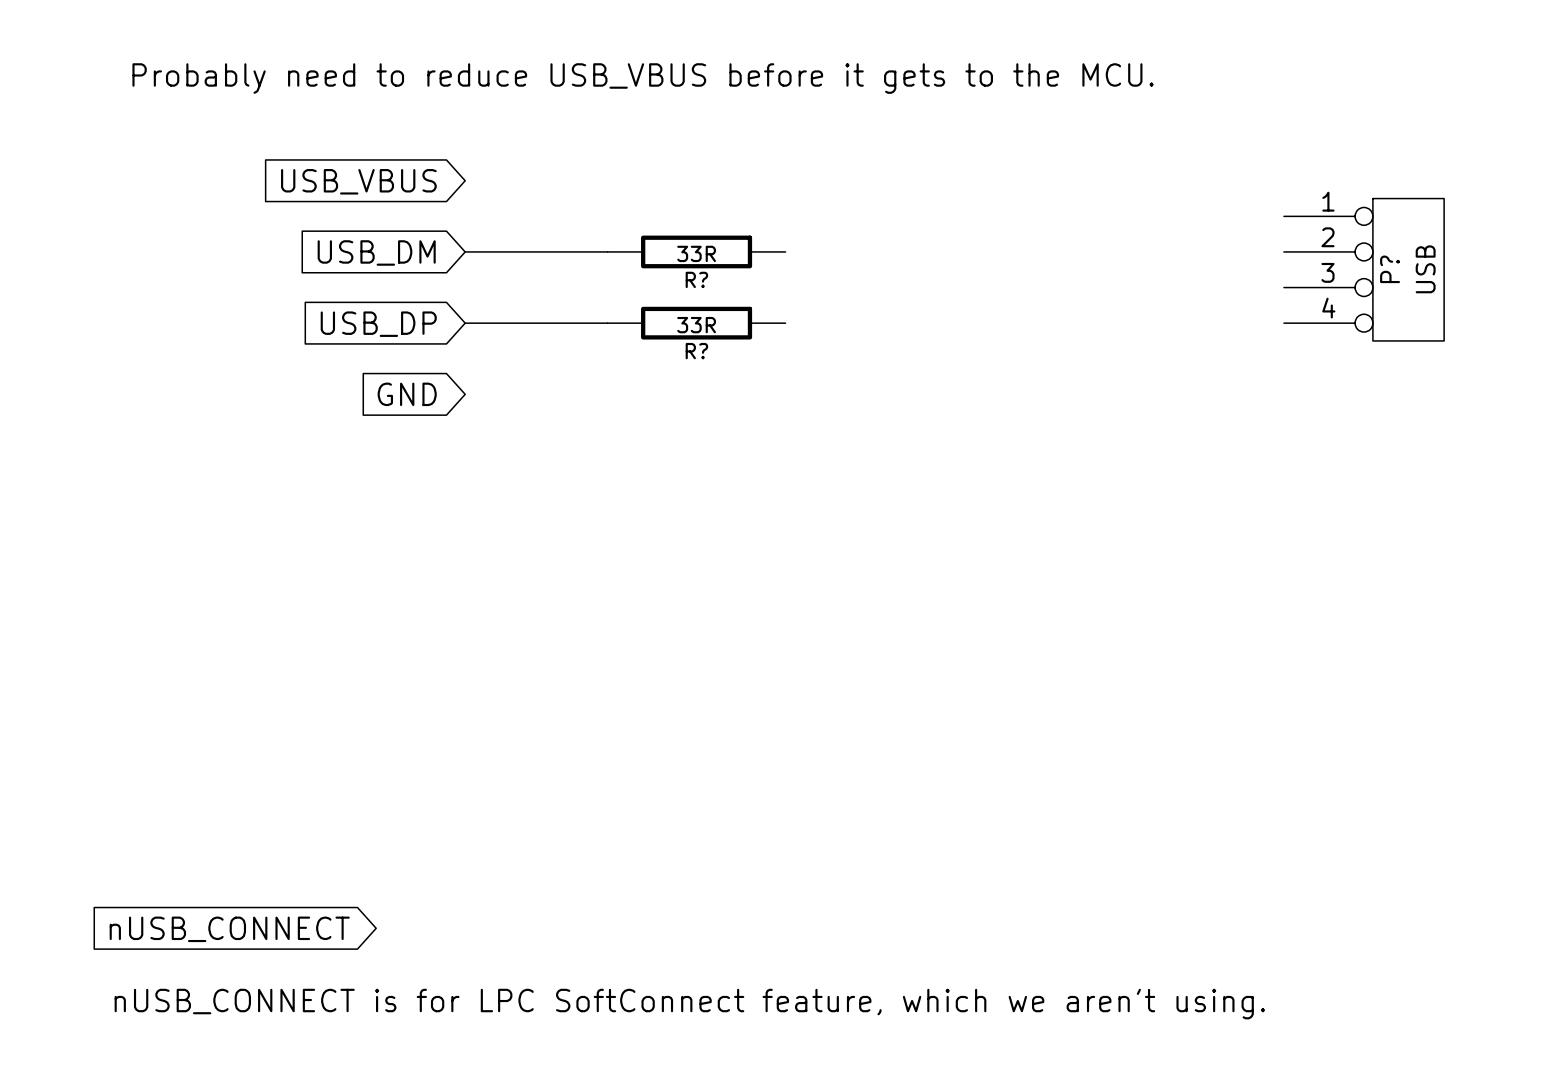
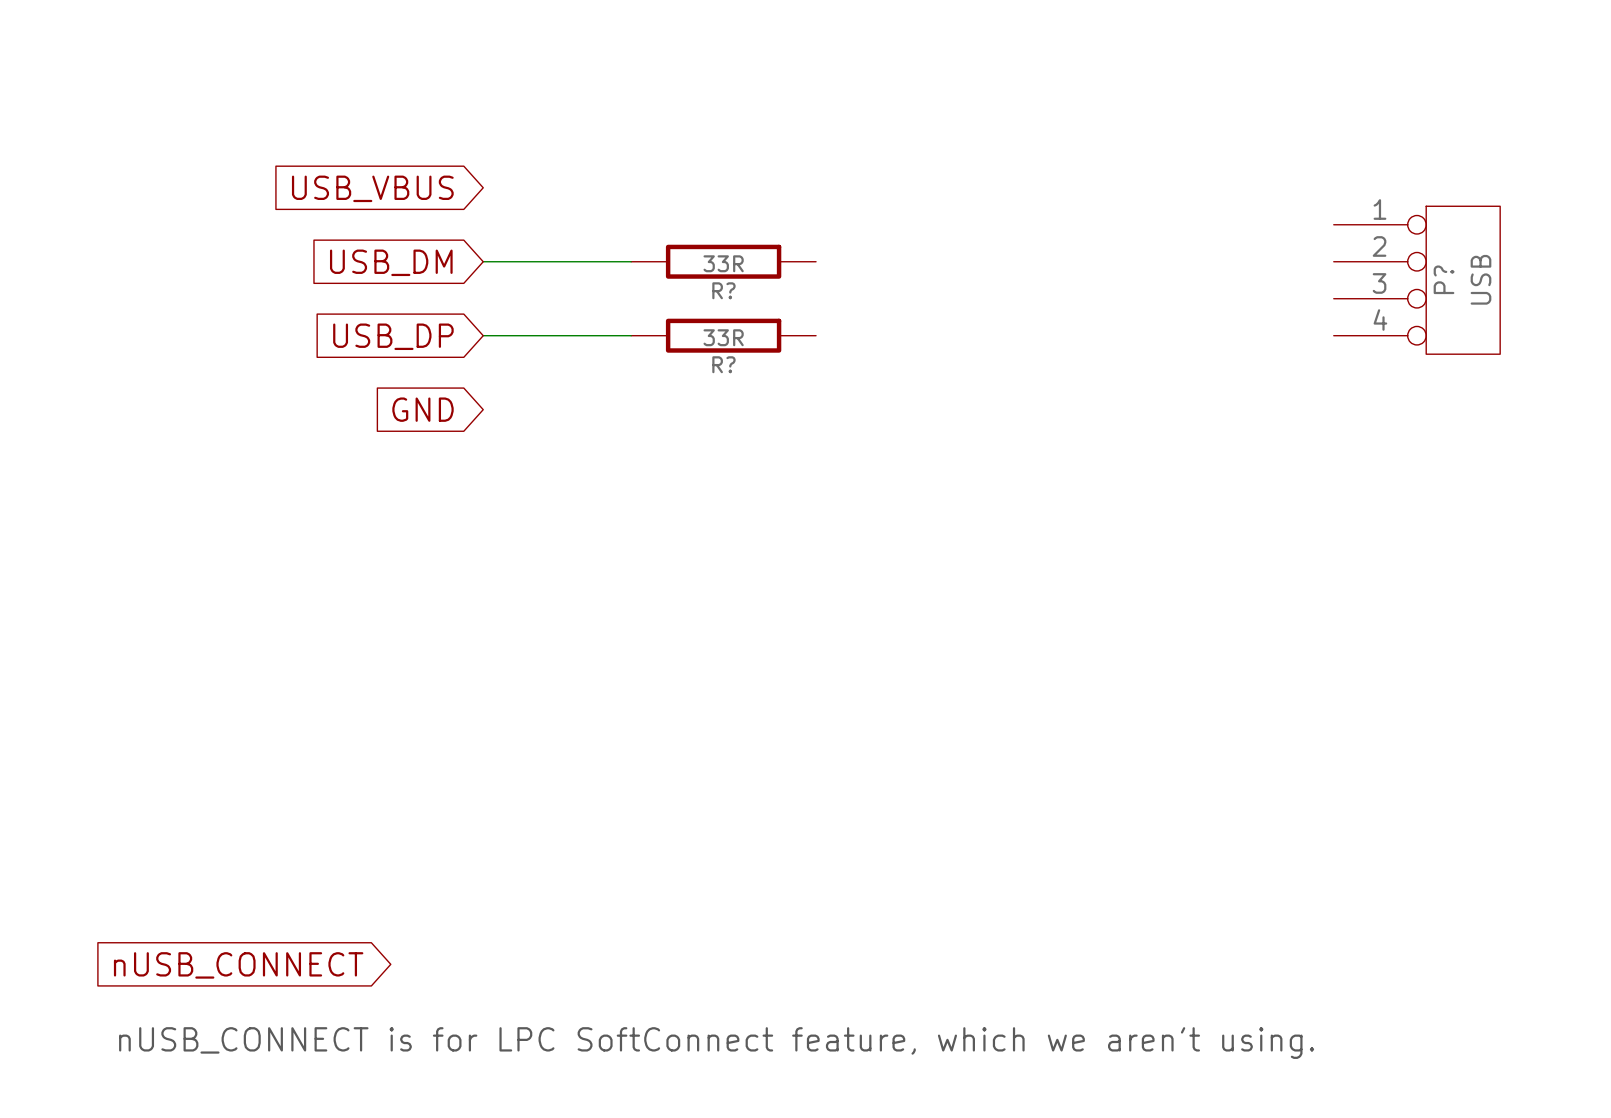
text: Probably need to reduce USB_VBUS before it gets to the MCU. (643, 78) -> none

